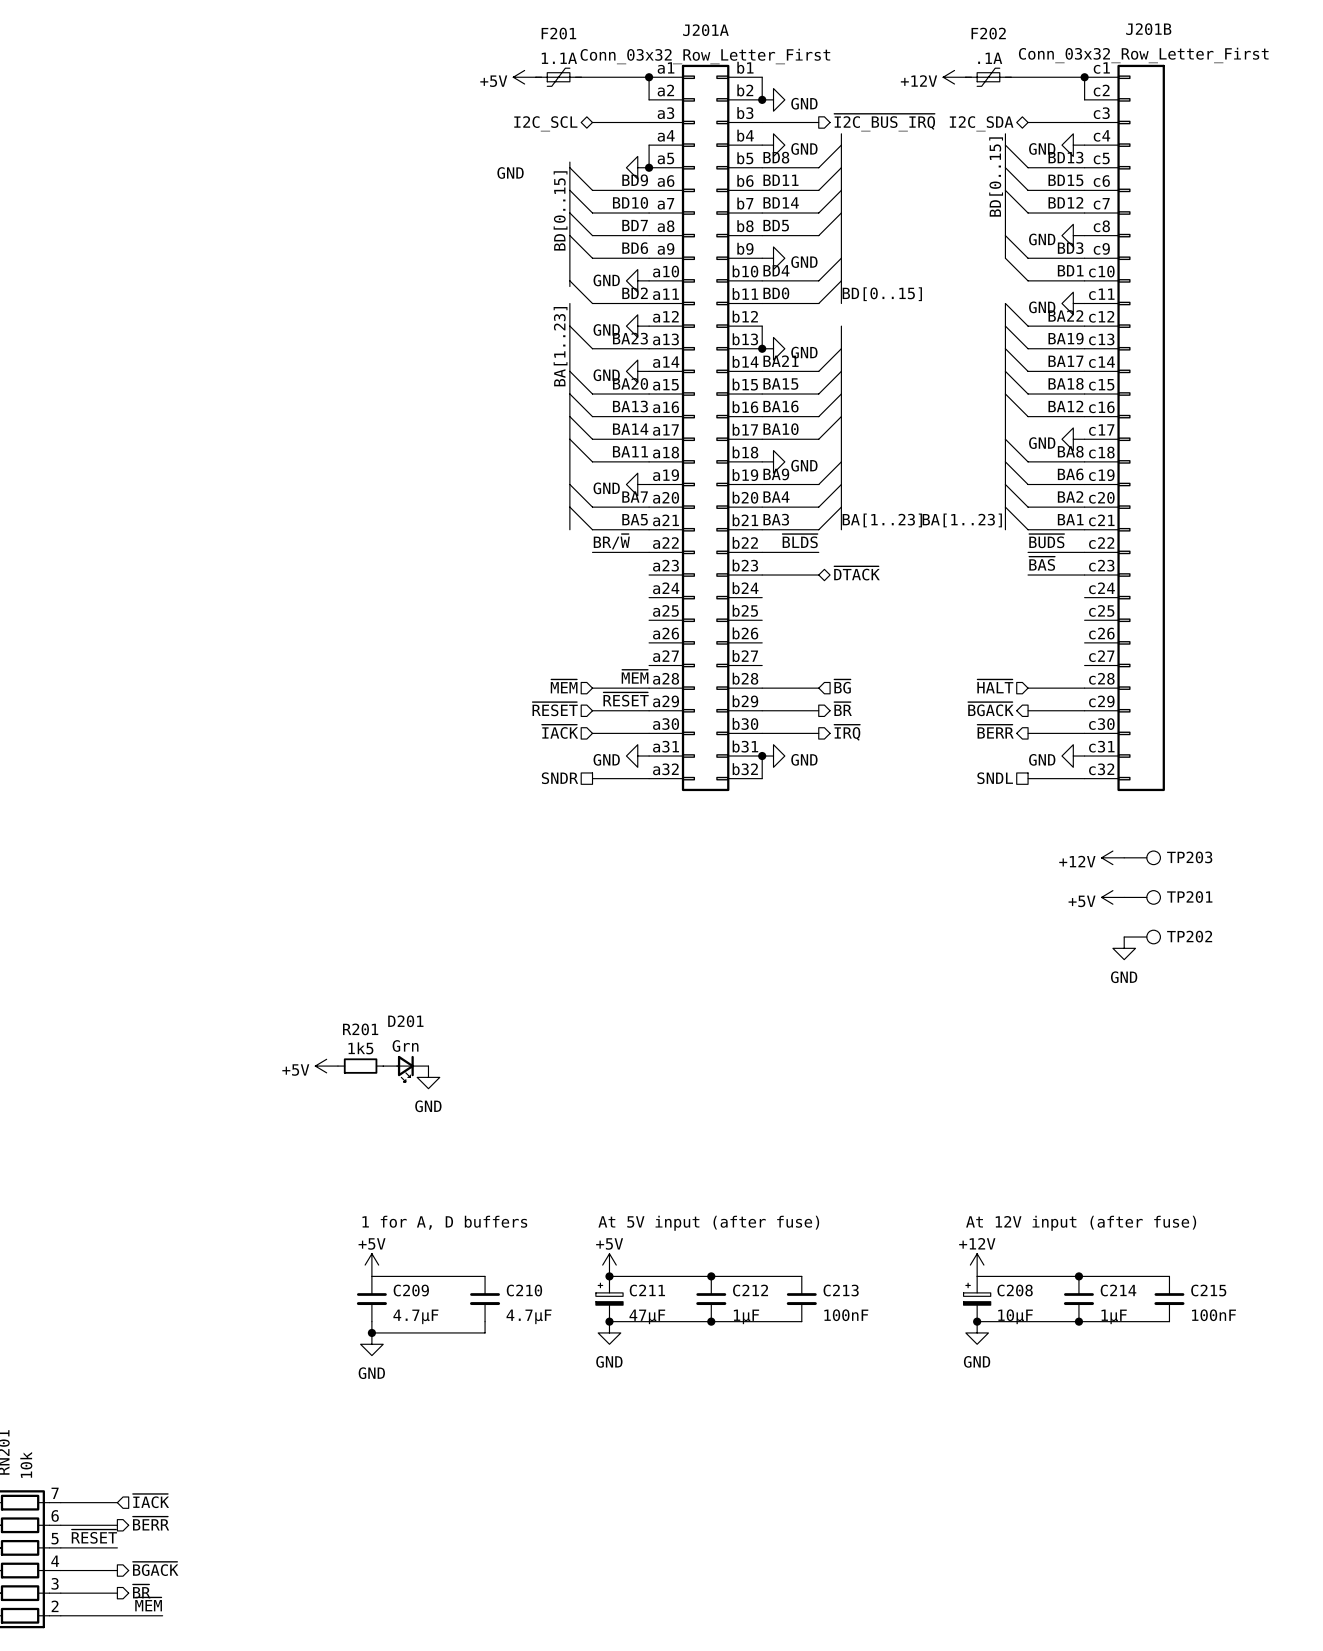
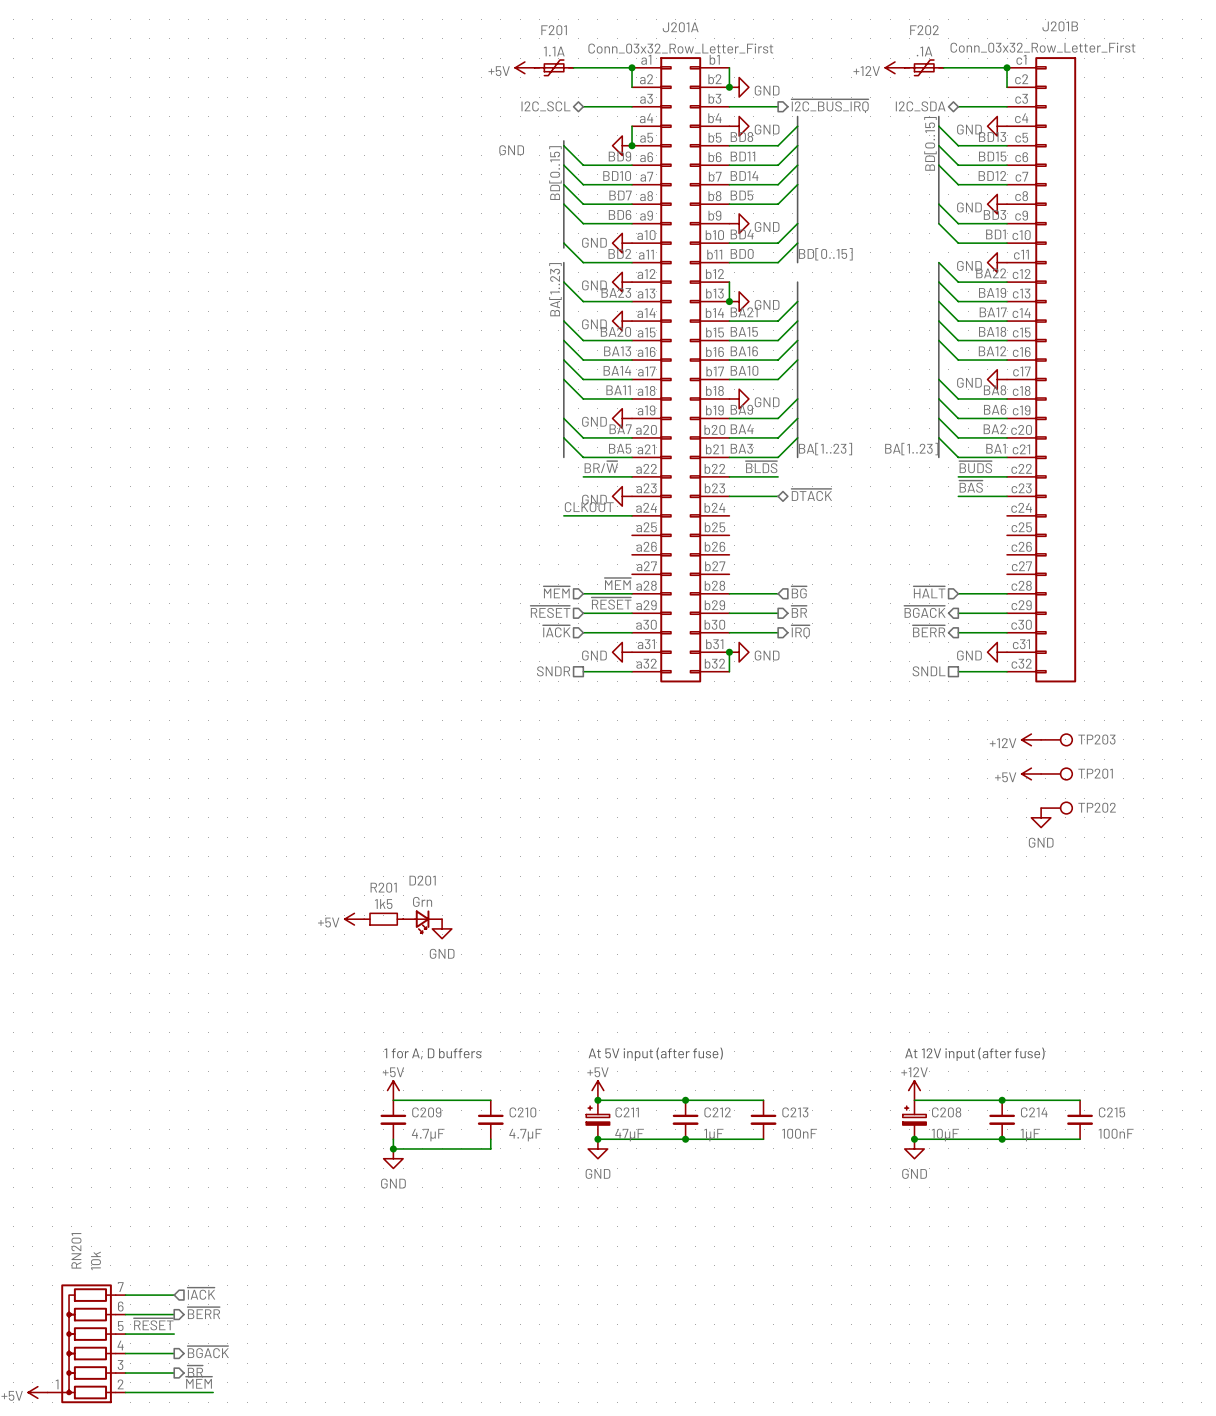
power symbol: none -> GND (622, 496)
label: none -> CLKOUT (589, 507)
wire: none -> (563, 515) (632, 515)

